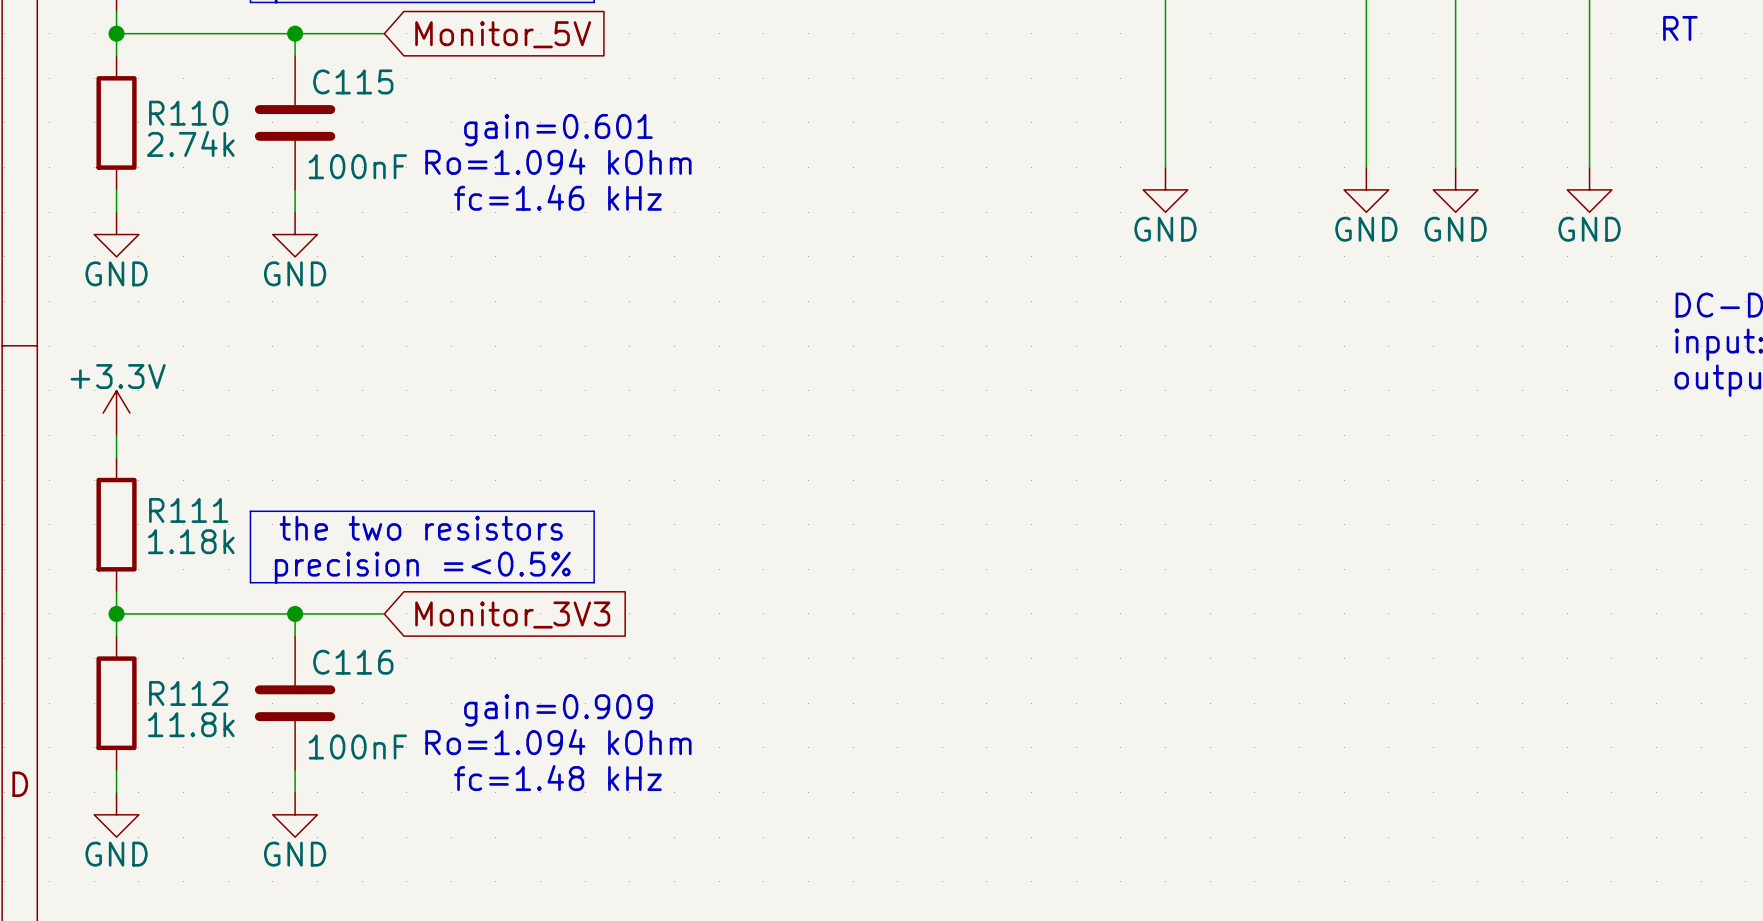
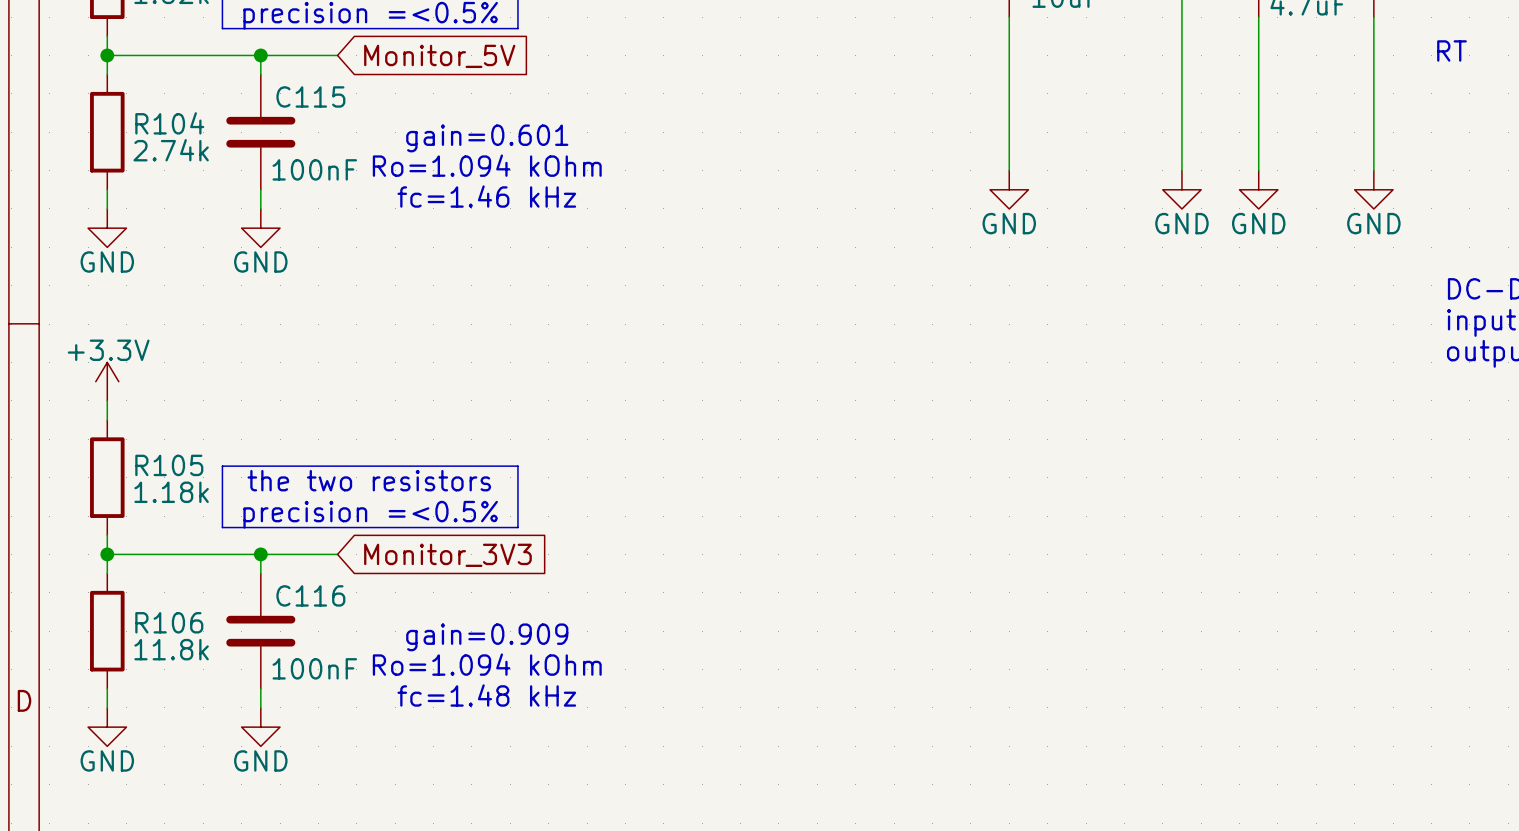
R110 name: R110 (188, 113) -> R104 (169, 123)
R111 name: R111 (188, 510) -> R105 (169, 465)
R112 name: R112 (188, 693) -> R106 (169, 622)

